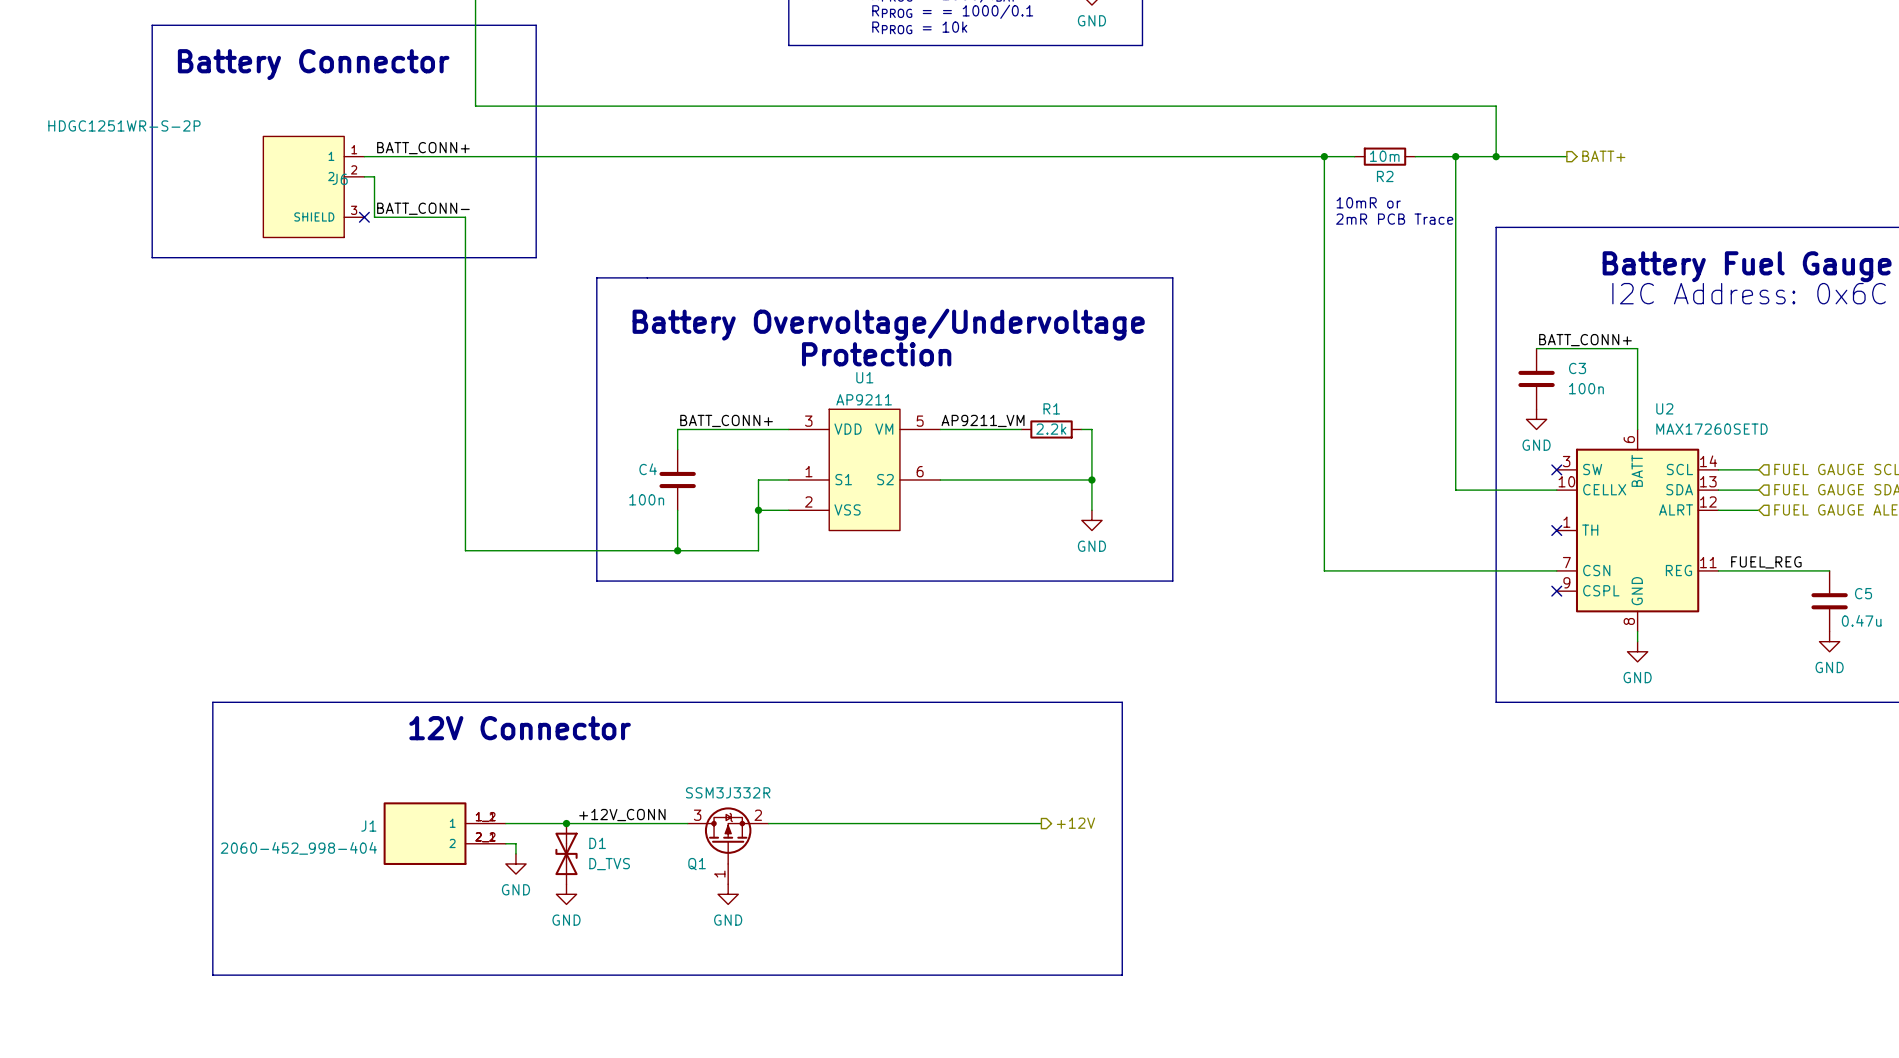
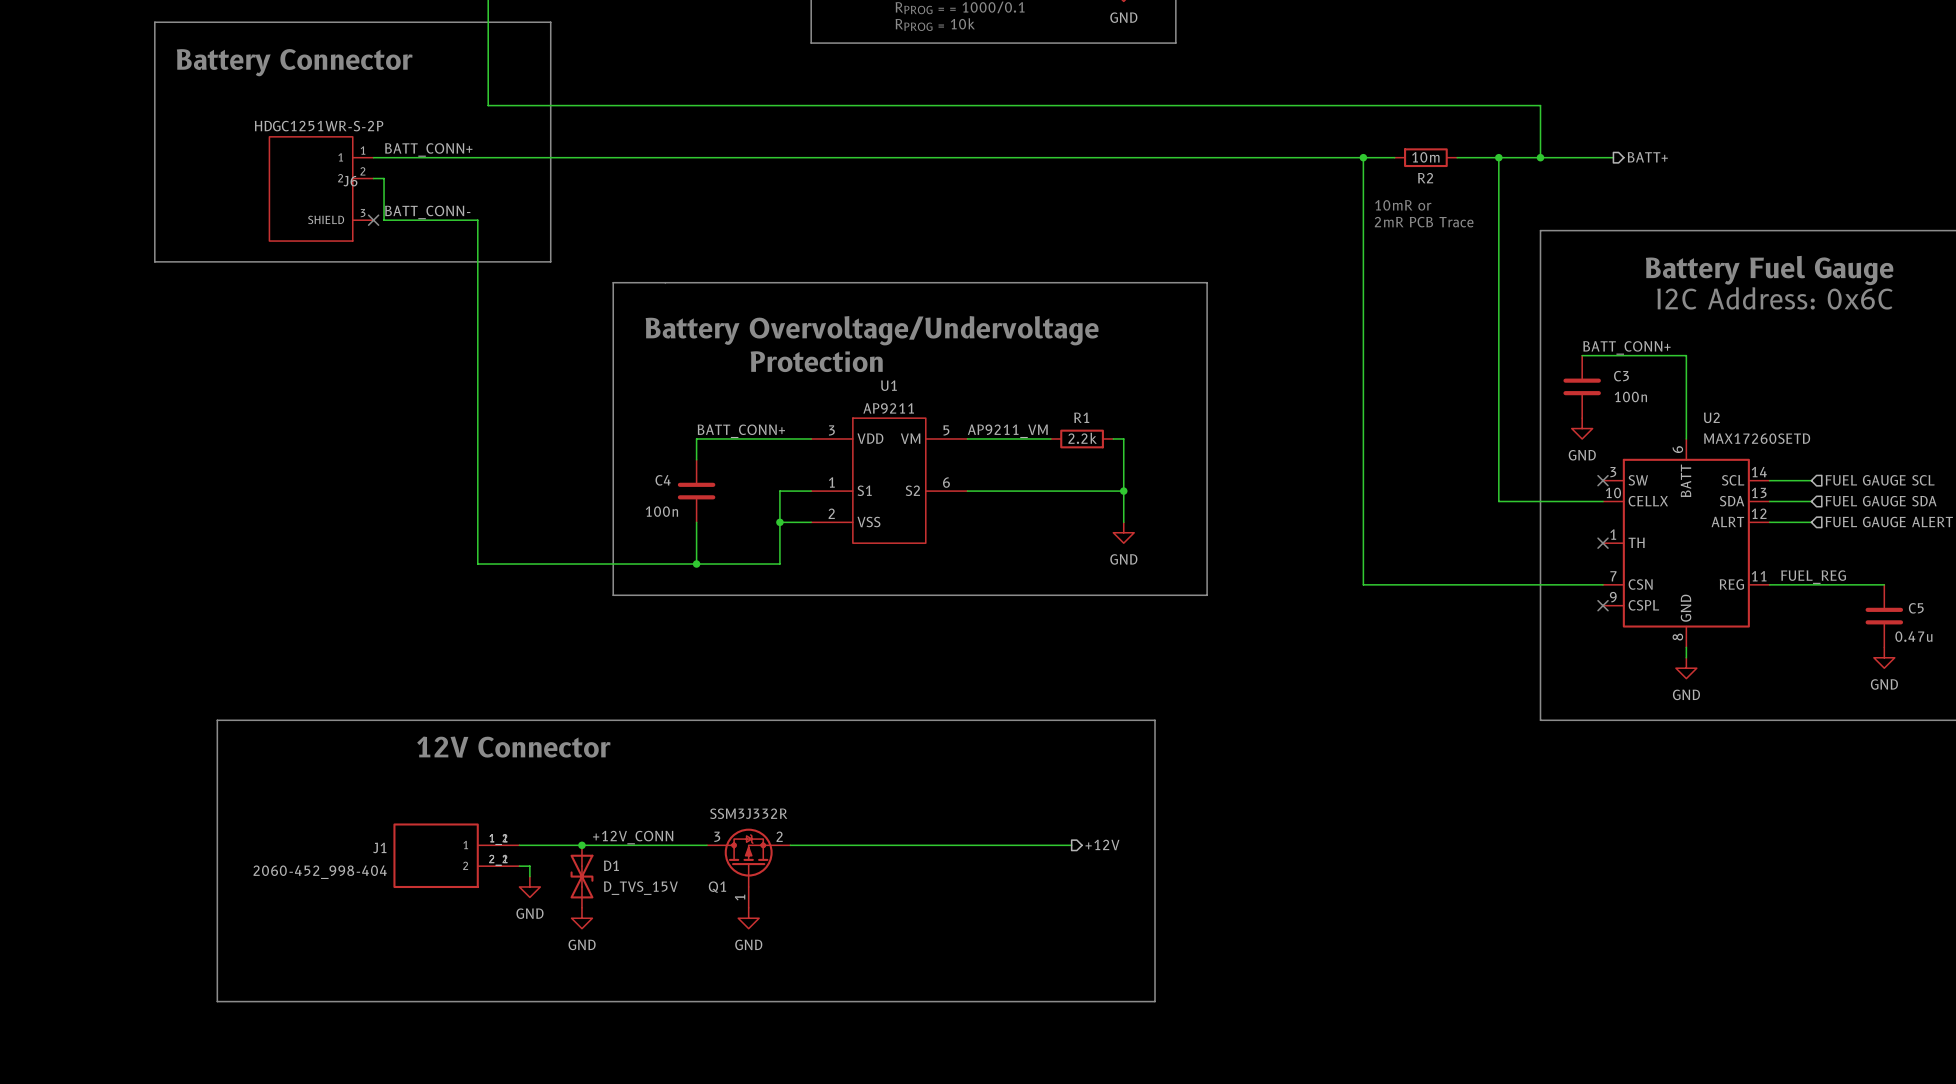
J6 value position: HDGC1251WR-S-2P (124, 125) -> HDGC1251WR-S-2P (319, 126)
D1 value: D_TVS (609, 864) -> D_TVS_15V (640, 888)

